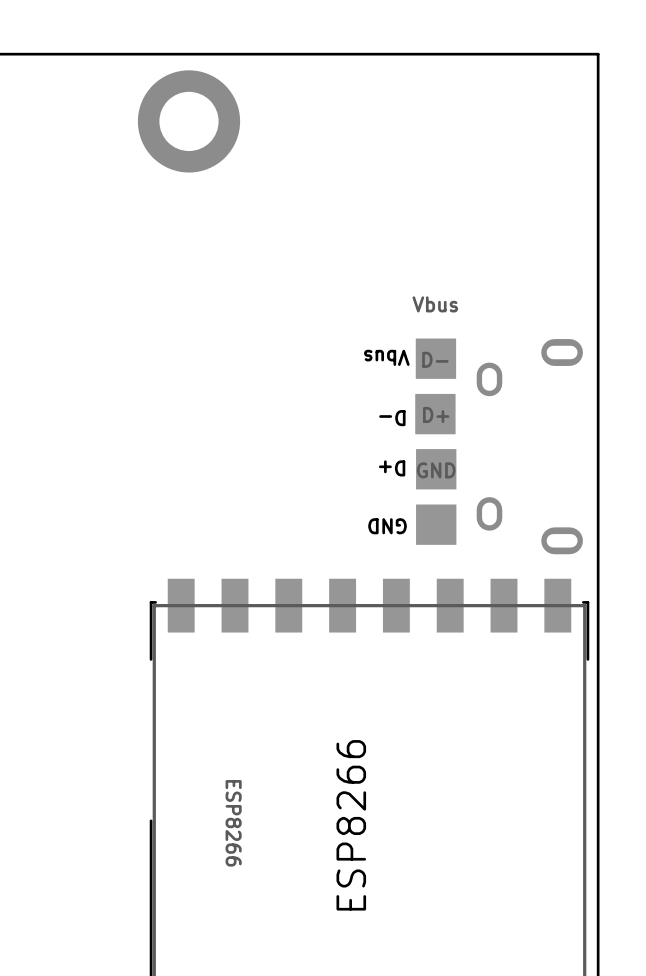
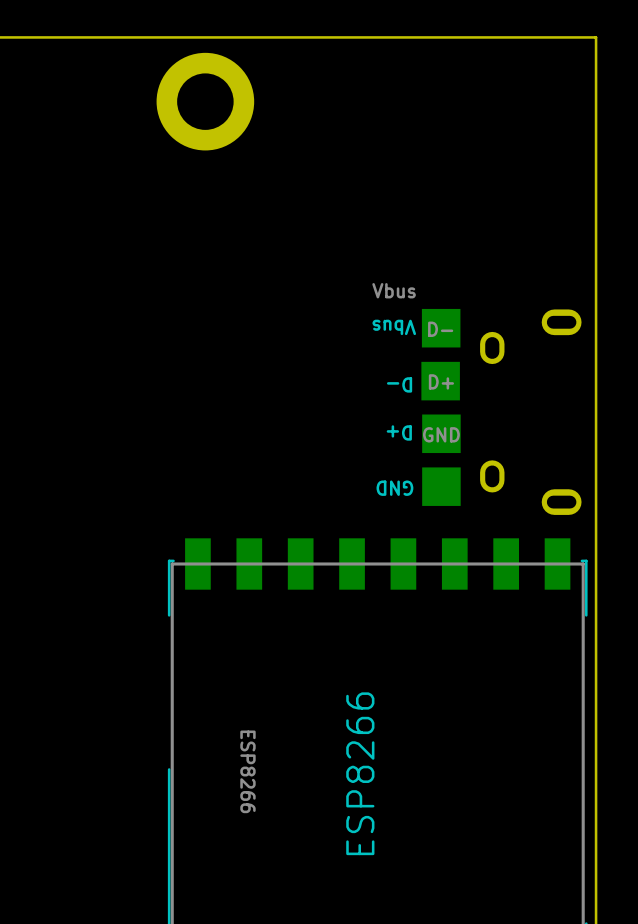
part value position: Vbus (435, 304) -> Vbus (394, 290)

